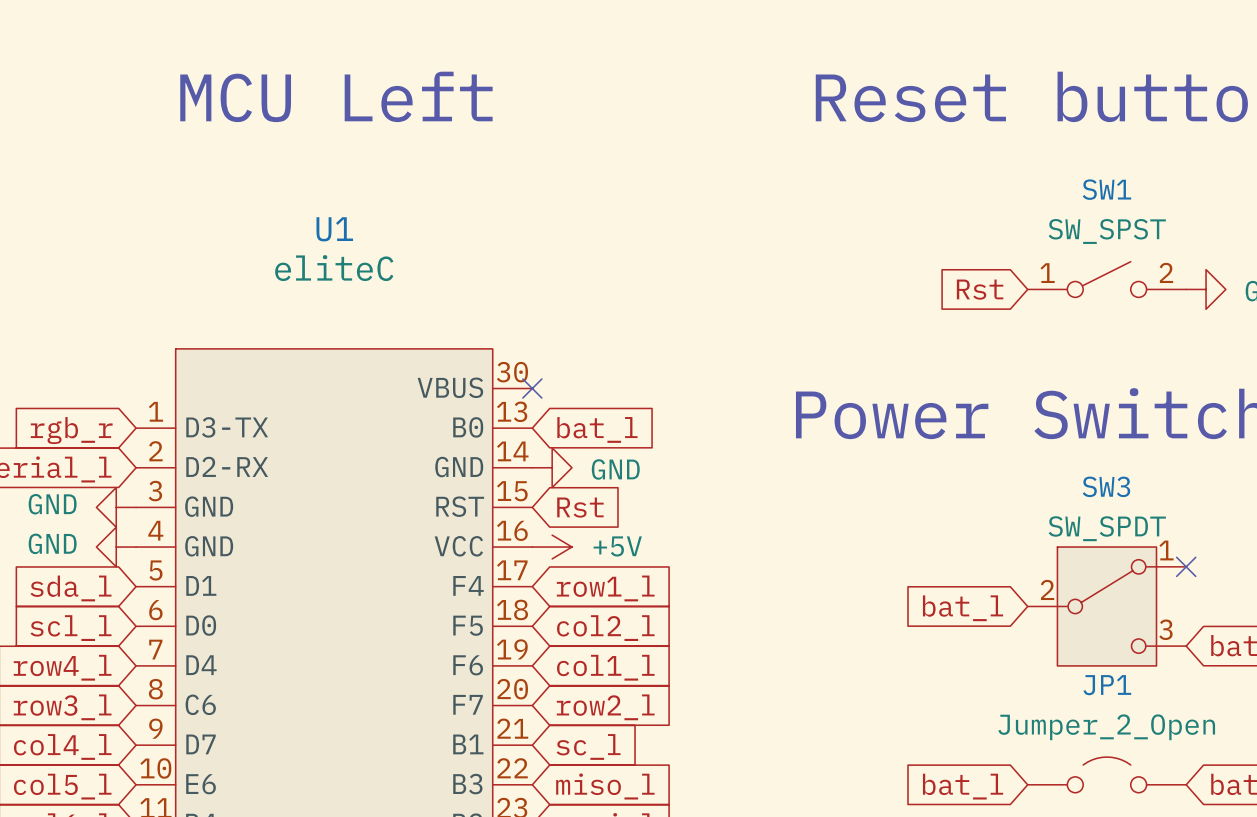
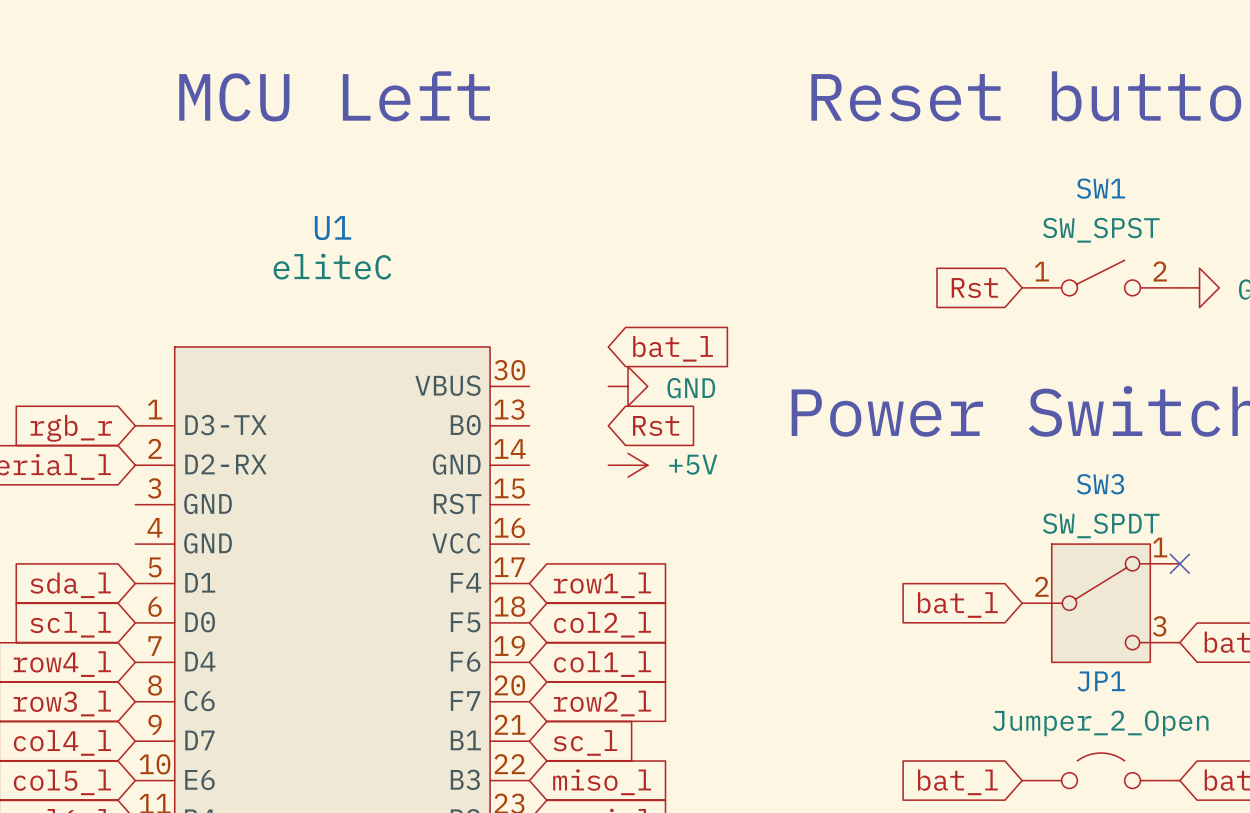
no-connect mark: (532, 388) -> none
global label position: bat_l (597, 429) -> bat_l (673, 348)
power symbol position: GND (552, 467) -> GND (628, 386)
power symbol: GND (116, 507) -> none
global label position: Rst (580, 507) -> Rst (656, 426)
power symbol: GND (116, 547) -> none
power symbol position: +5V (552, 547) -> +5V (628, 465)

